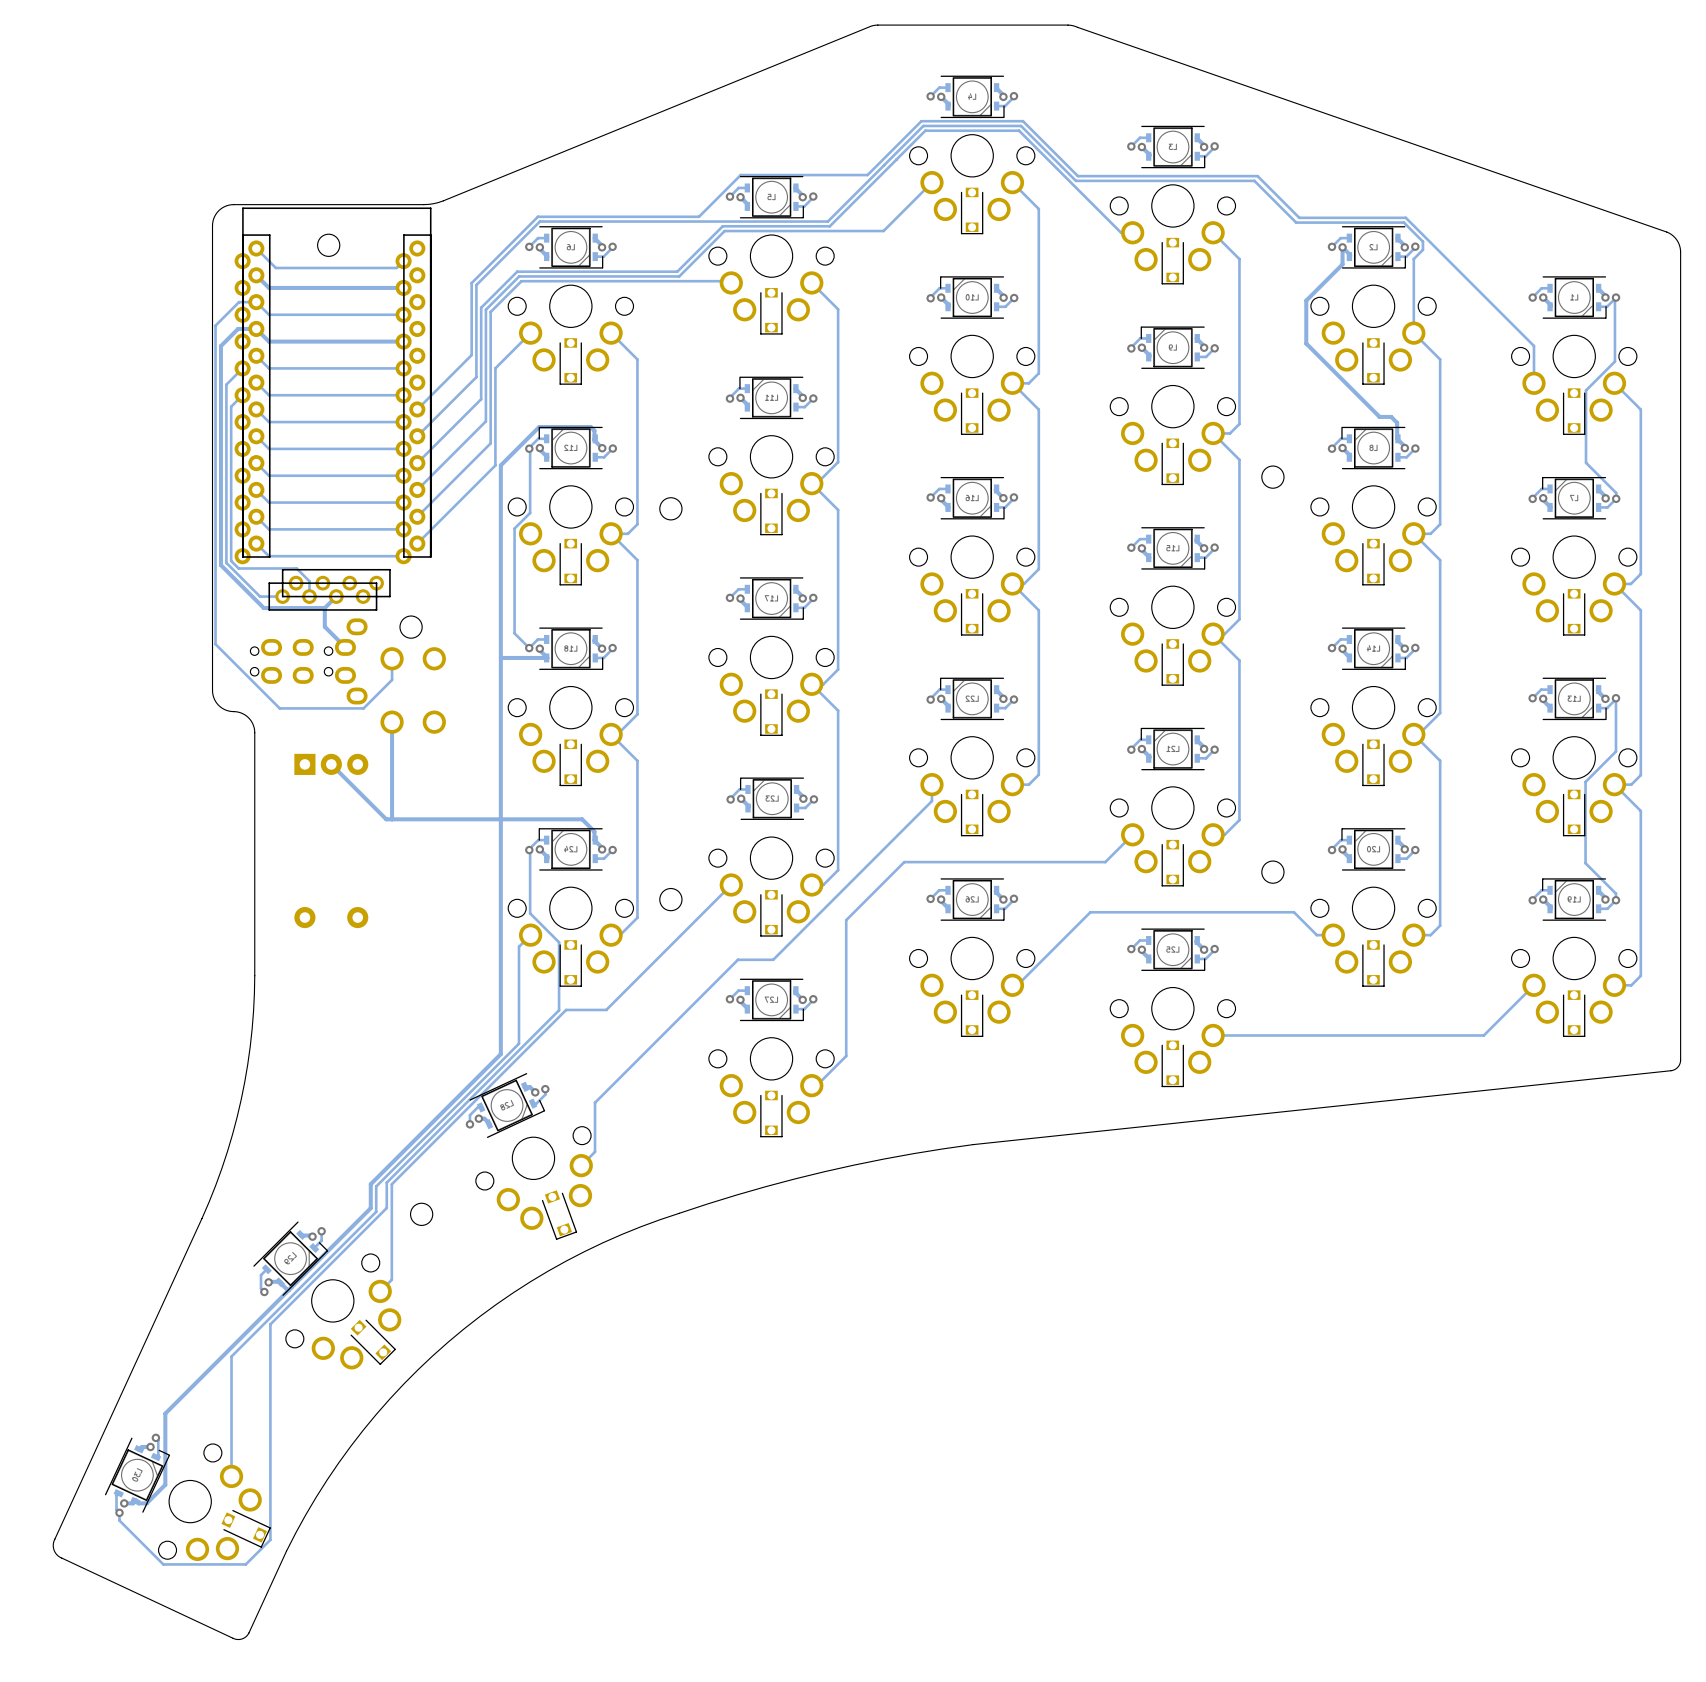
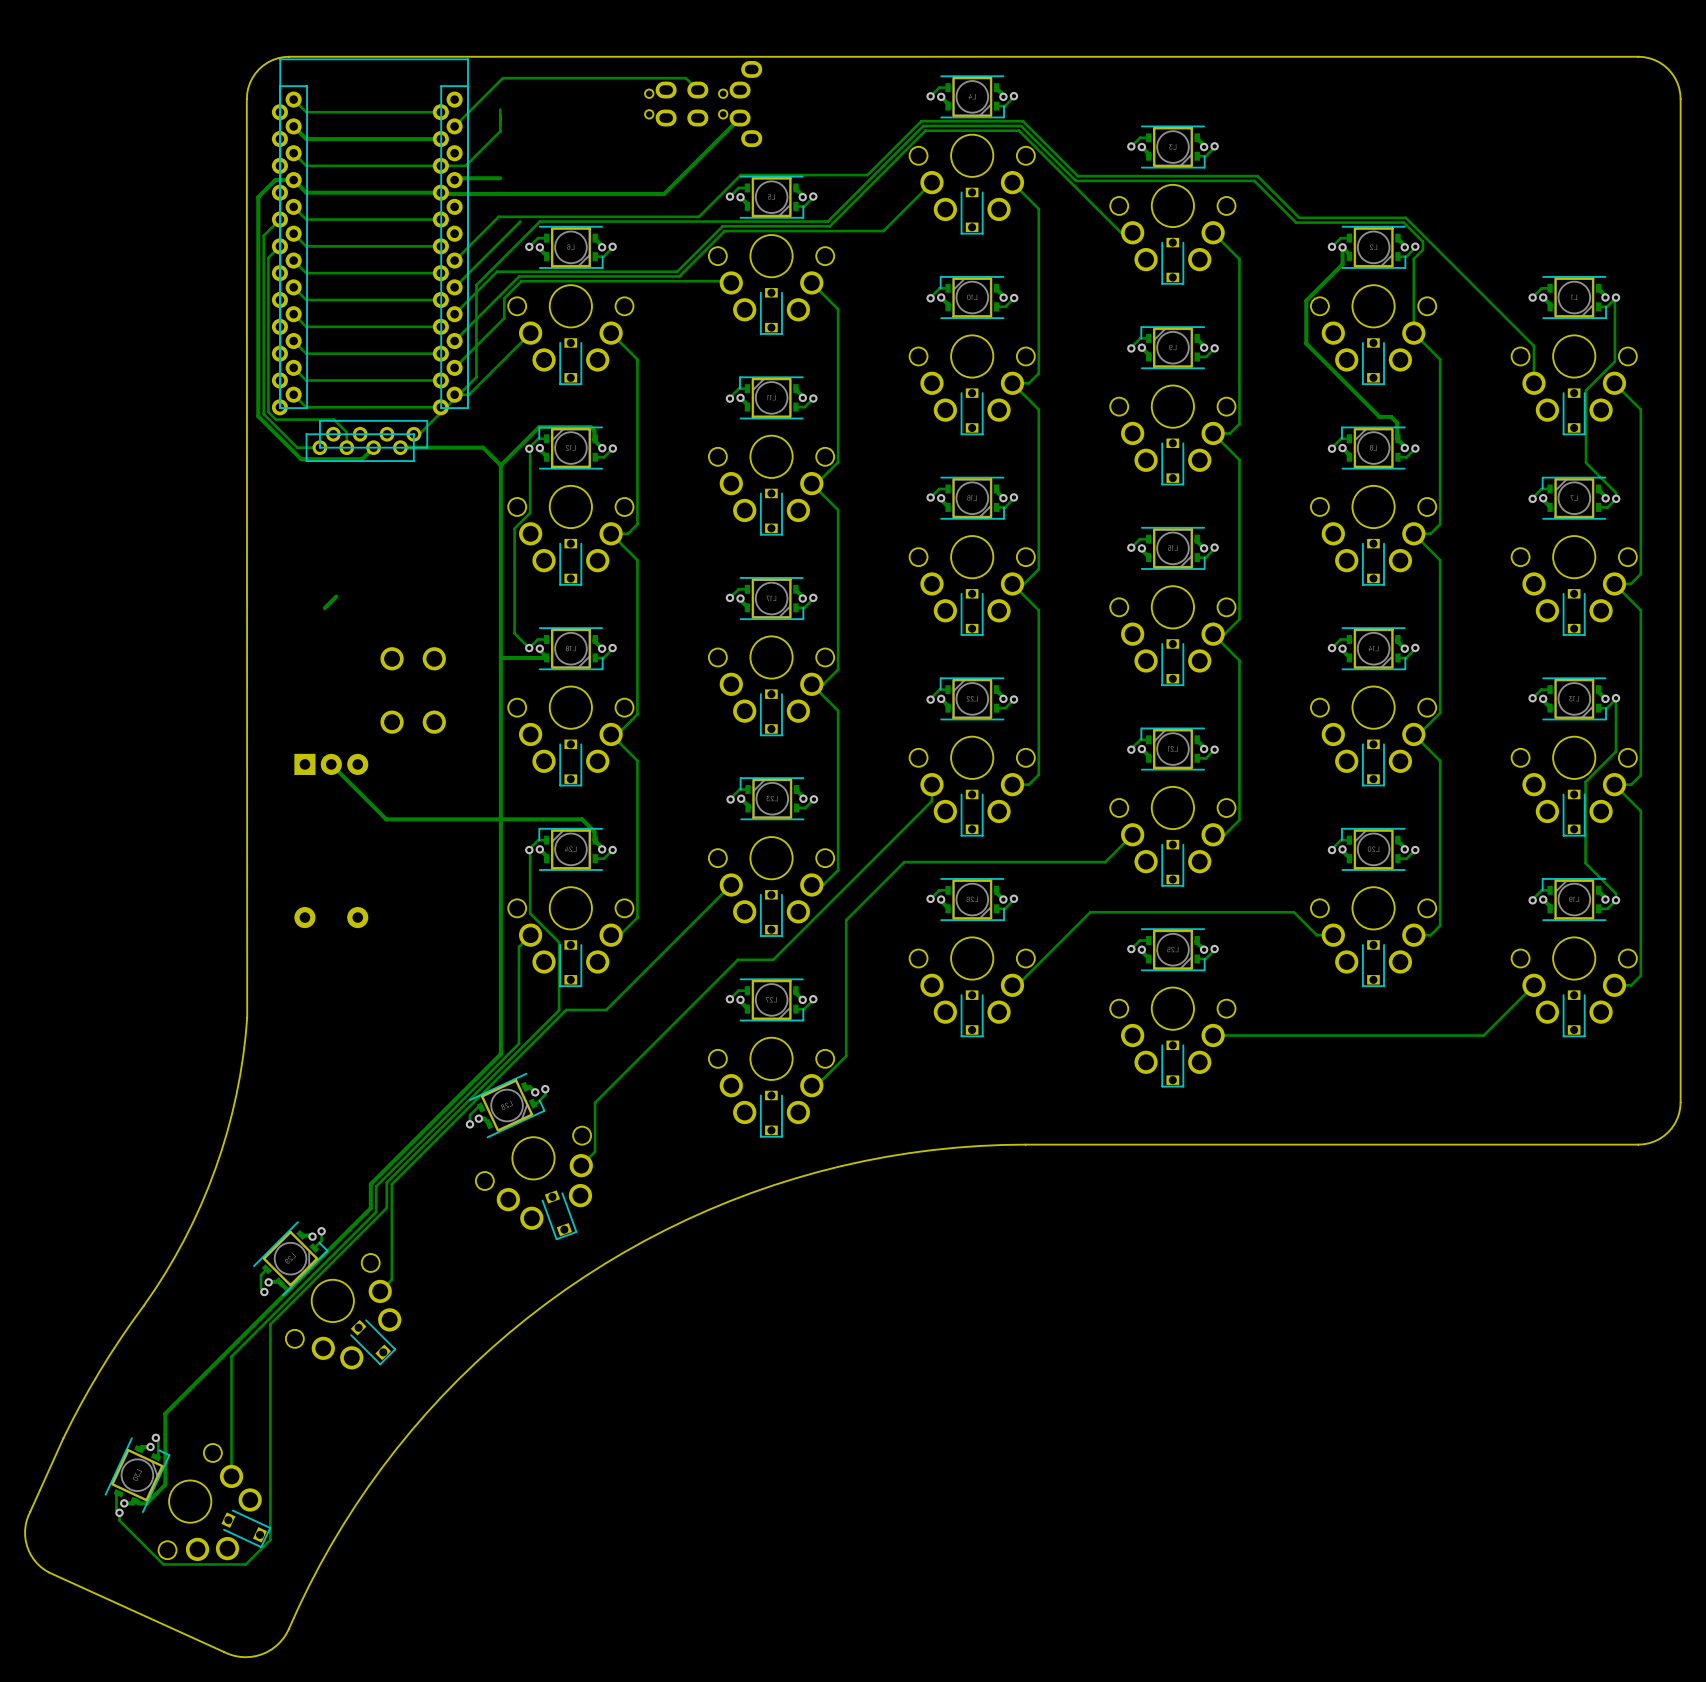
track: none -> (697, 90) (685, 78) (502, 78) (454, 126)
track: none -> (293, 99) (306, 112) (440, 112)
part: none -> (703, 104)
track: none -> (500, 109) (500, 131) (465, 165) (306, 165) (293, 153)
track: none -> (740, 118) (664, 193) (442, 193)
track: none -> (500, 178) (456, 178)
track: none -> (440, 192) (306, 192) (293, 180) (275, 180) (258, 197) (258, 416) (301, 459) (362, 459) (373, 447)
track: (537, 216) (471, 283) (471, 355) (417, 409) -> (537, 216) (498, 216) (454, 260)
track: none -> (520, 221) (454, 287)
round board edge: [317, 233, 341, 257] -> none
track: (256, 248) (275, 268) (396, 268) (403, 261) -> none
board edge: (1680, 251) (1676, 239) (1666, 232) (1068, 25) (874, 25) (438, 202) (423, 204) (233, 204) (220, 209) (214, 216) (212, 225) (212, 690) (213, 697) (218, 705) (226, 710) (244, 714) (251, 721) (254, 730) (254, 975) (250, 1047) (237, 1117) (215, 1185) (54, 1540) (54, 1550) (60, 1557) (233, 1638) (243, 1638) (248, 1633) (295, 1533) (327, 1480) (376, 1414) (432, 1355) (496, 1304) (566, 1261) (640, 1226) (736, 1194) (824, 1171) (943, 1148) (1671, 1070) (1677, 1067) (1680, 1060) -> (1680, 251) (1680, 93) (1674, 77) (1668, 69) (1659, 62) (1643, 57) (289, 56) (272, 59) (263, 65) (250, 82) (246, 99) (247, 1017) (240, 1075) (221, 1150) (201, 1204) (165, 1273) (110, 1353) (72, 1420) (28, 1516) (25, 1530) (26, 1545) (36, 1563) (48, 1572) (229, 1654) (240, 1656) (256, 1655) (271, 1649) (283, 1638) (319, 1565) (355, 1505) (396, 1449) (458, 1379) (510, 1332) (565, 1289) (624, 1252) (708, 1210) (773, 1185) (840, 1166) (909, 1153) (979, 1145) (1643, 1144) (1664, 1135) (1677, 1118) (1680, 1102) (1680, 1060)
track: (517, 271) (481, 307) (481, 399) (417, 463) -> (517, 271) (497, 271) (454, 314)
track: (256, 275) (268, 287) (403, 287) -> (293, 126) (306, 139) (440, 139)
track: (504, 298) (490, 311) (490, 443) (417, 516) -> (504, 298) (504, 318) (454, 367)
track: (485, 309) (485, 421) (417, 489) -> (485, 309) (454, 341)
track: (403, 314) (268, 314) (256, 302) (239, 302) (215, 325) (215, 644) (279, 708) (363, 708) (392, 679) (392, 658) -> none
track: (403, 341) (268, 341) (256, 328) (238, 328) (220, 346) (220, 565) (263, 608) (324, 608) (324, 626) (345, 647) -> none
track: (256, 355) (268, 368) (403, 368) -> (293, 206) (306, 219) (440, 219)
track: (242, 368) (226, 384) (226, 562) (260, 596) (282, 596) -> (279, 219) (263, 235) (263, 414) (297, 447) (319, 447)
track: (495, 368) (495, 465) (417, 543) -> (495, 368) (469, 394) (454, 394)
track: (256, 382) (268, 395) (403, 395) -> (293, 233) (306, 246) (440, 246)
part position: (333, 385) -> (370, 236)
track: (242, 395) (231, 406) (231, 560) (238, 568) (296, 568) (309, 581) (309, 596) -> (279, 246) (268, 257) (268, 412) (275, 419) (333, 419) (346, 432) (346, 447)
track: (256, 409) (268, 422) (403, 422) -> (293, 260) (306, 273) (440, 273)
track: (256, 436) (268, 448) (403, 448) -> (293, 287) (306, 300) (440, 300)
track: none -> (400, 447) (483, 447) (500, 465)
track: (256, 463) (268, 475) (403, 475) -> (293, 314) (306, 326) (440, 326)
round board edge: [1261, 465, 1285, 489] -> none
track: (256, 489) (268, 502) (403, 502) -> (293, 341) (306, 353) (440, 353)
round board edge: [659, 497, 683, 521] -> none
track: (256, 516) (268, 529) (403, 529) -> (293, 367) (306, 380) (440, 380)
track: (256, 543) (268, 556) (403, 556) -> (293, 394) (306, 407) (440, 407)
part position: (329, 589) -> (366, 440)
round board edge: [399, 615, 423, 639] -> none
part: (309, 661) -> none
track: (392, 722) (392, 819) -> none
round board edge: [1261, 860, 1285, 884] -> none
round board edge: [659, 887, 683, 912] -> none
round board edge: [410, 1202, 434, 1226] -> none

